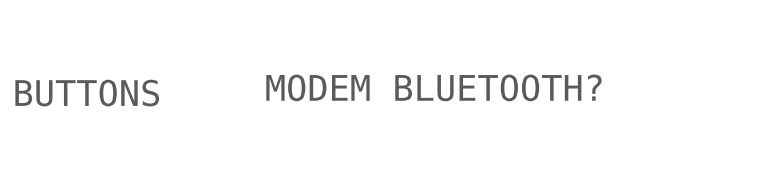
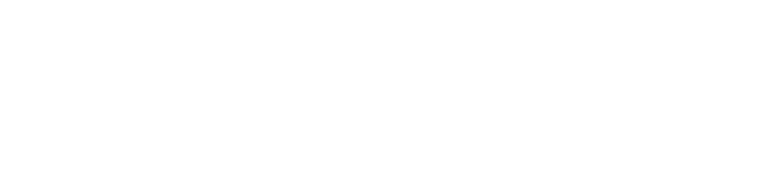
text: MODEM BLUETOOTH? (433, 87) -> none
text: BUTTONS (87, 93) -> none

